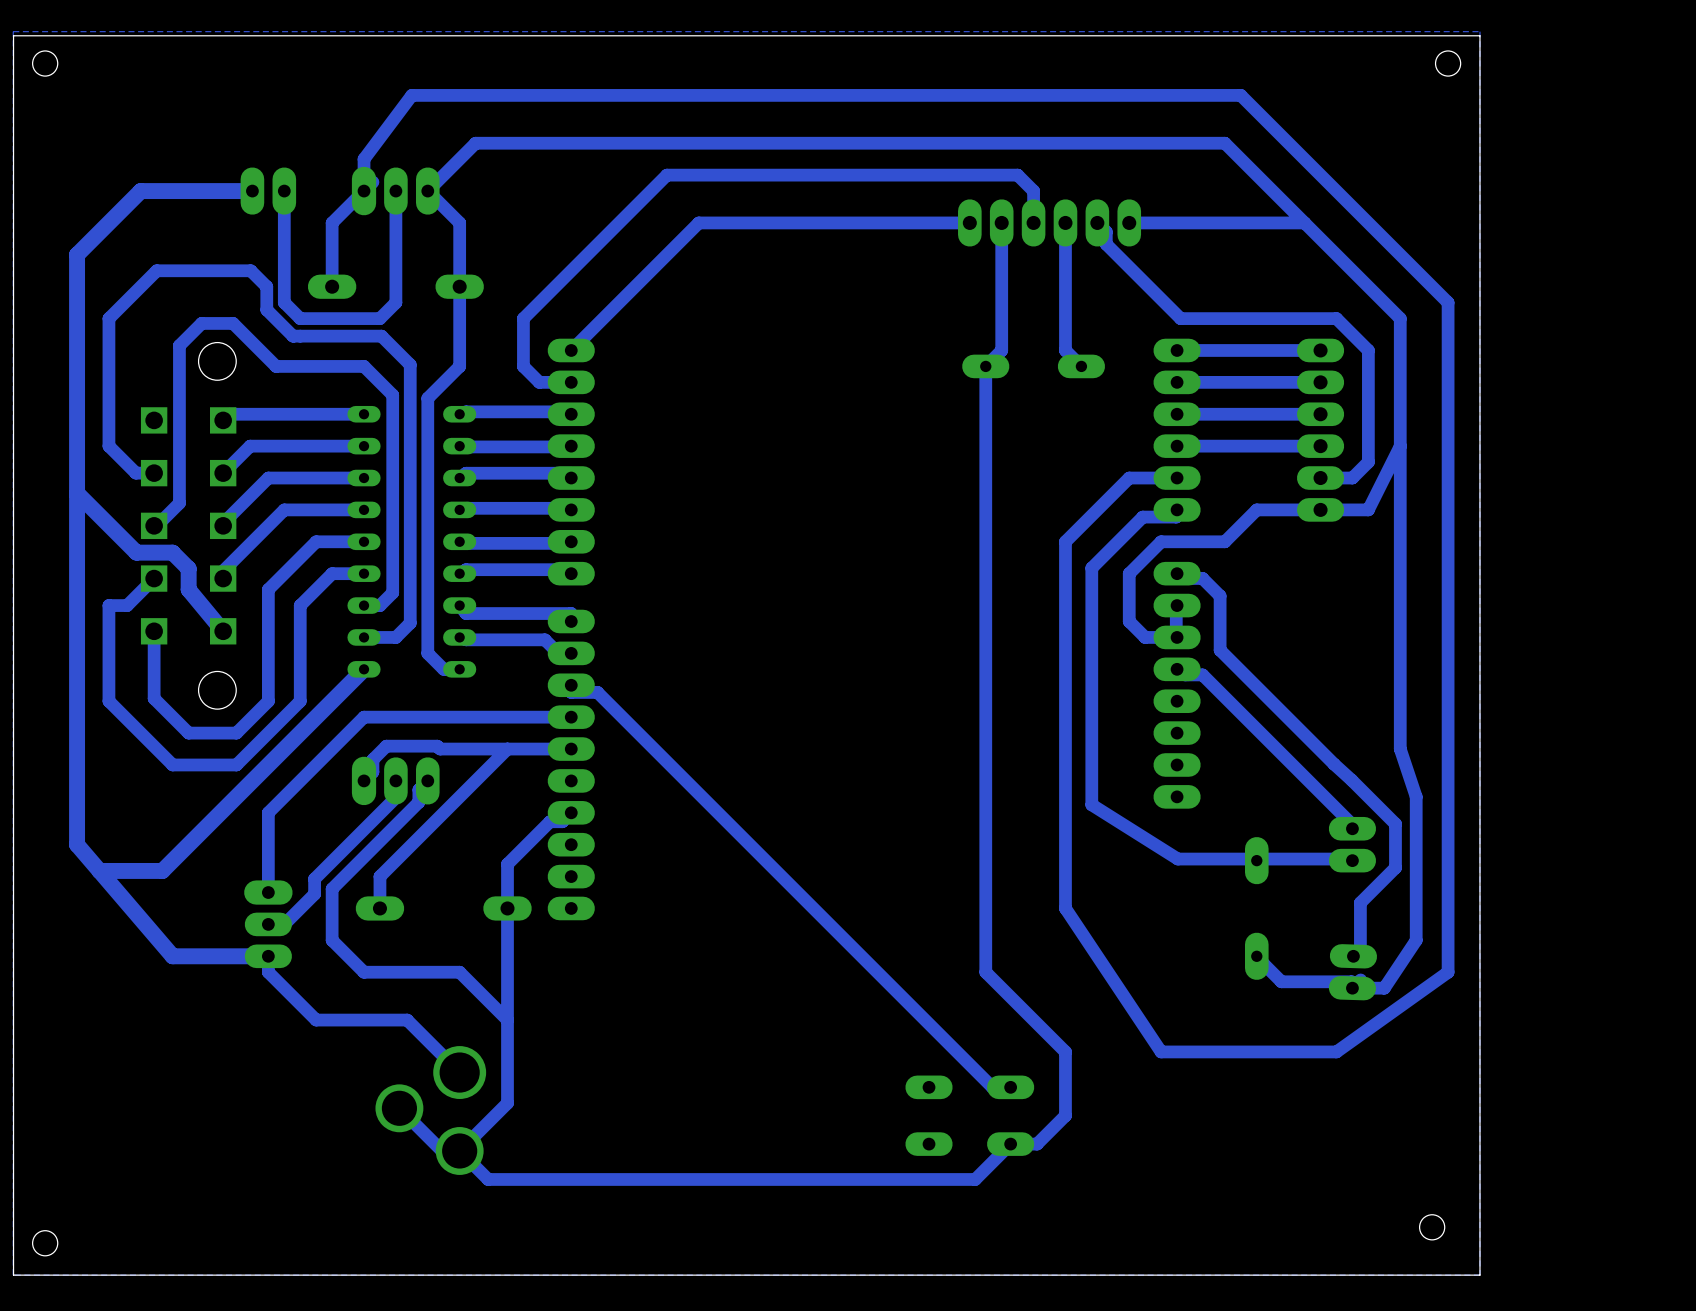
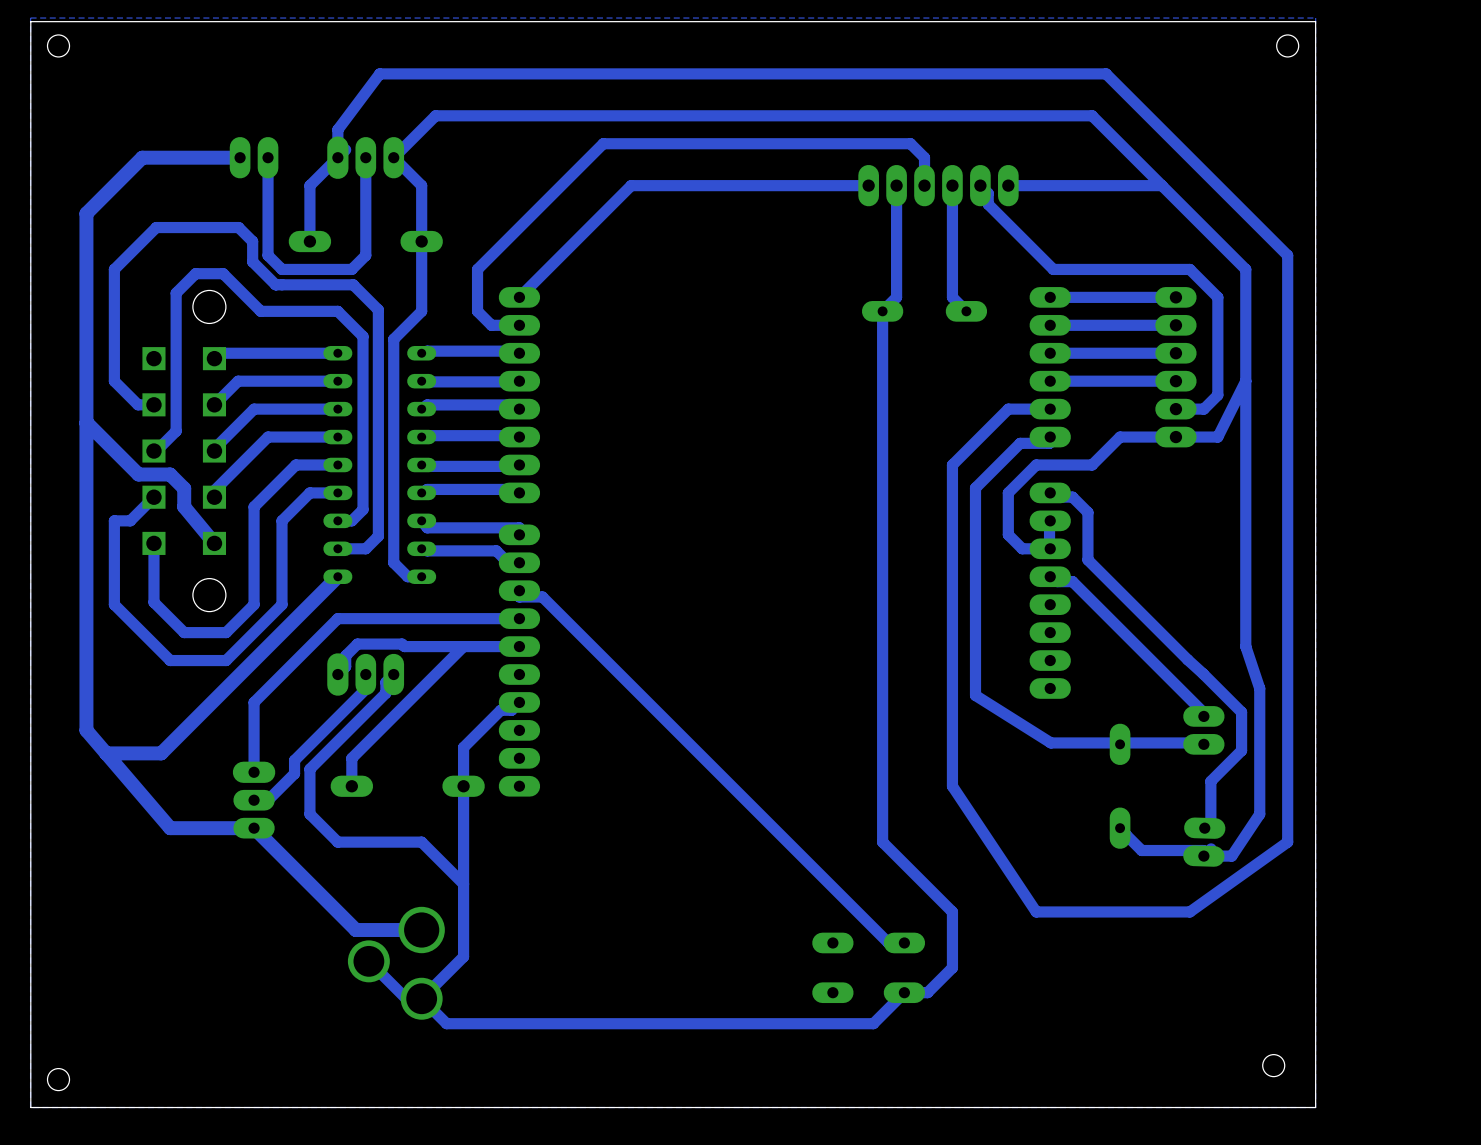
bottom track: (268, 956) (268, 972) (316, 1020) (407, 1020) (459, 1072) -> (254, 828) (355, 930) (421, 930) (383, 930)

